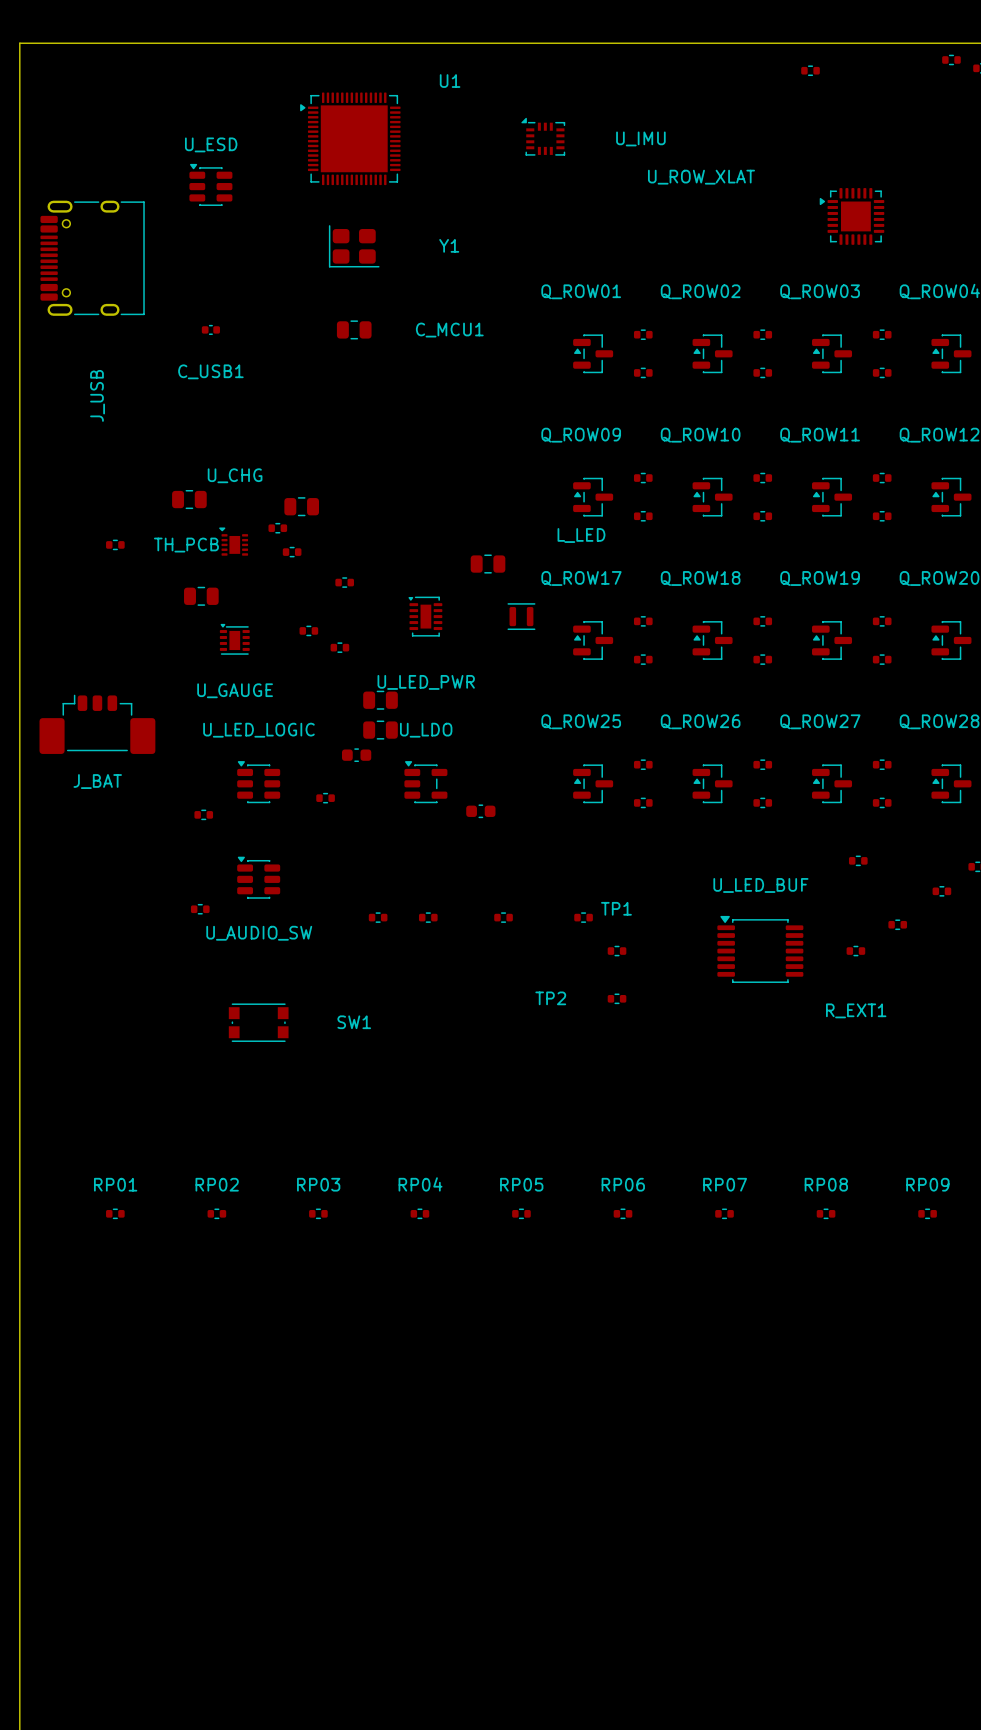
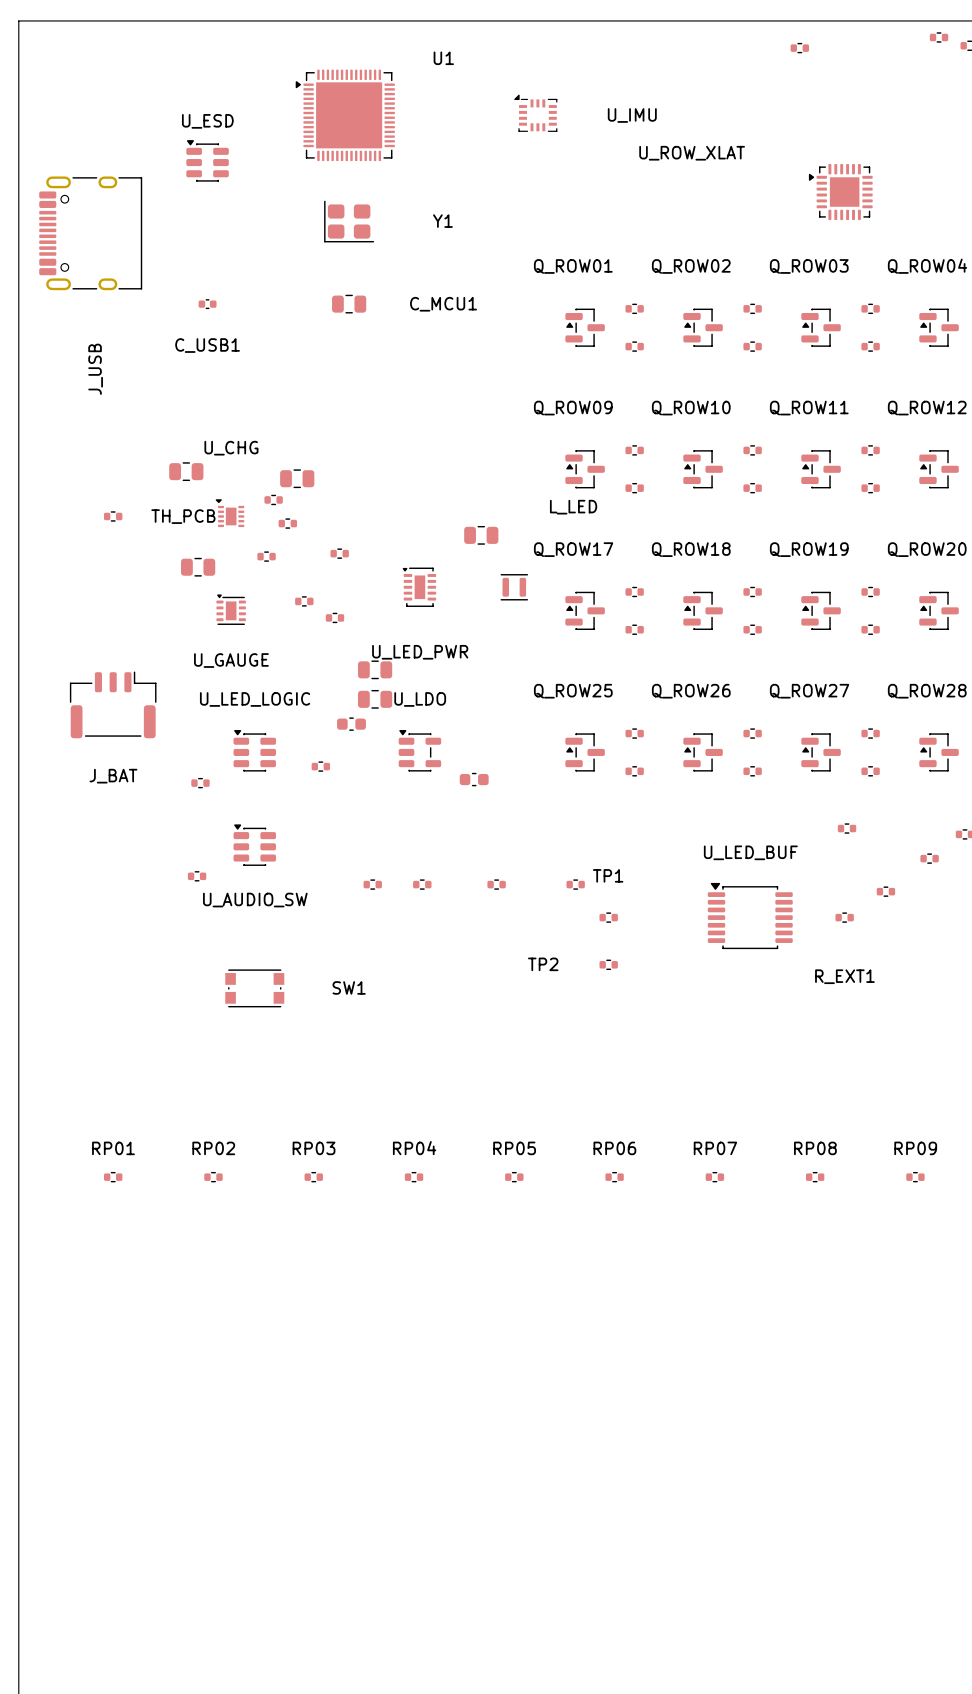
part: none -> (266, 556)
J_BAT: (97, 724) -> none
J_BAT: none -> (113, 704)

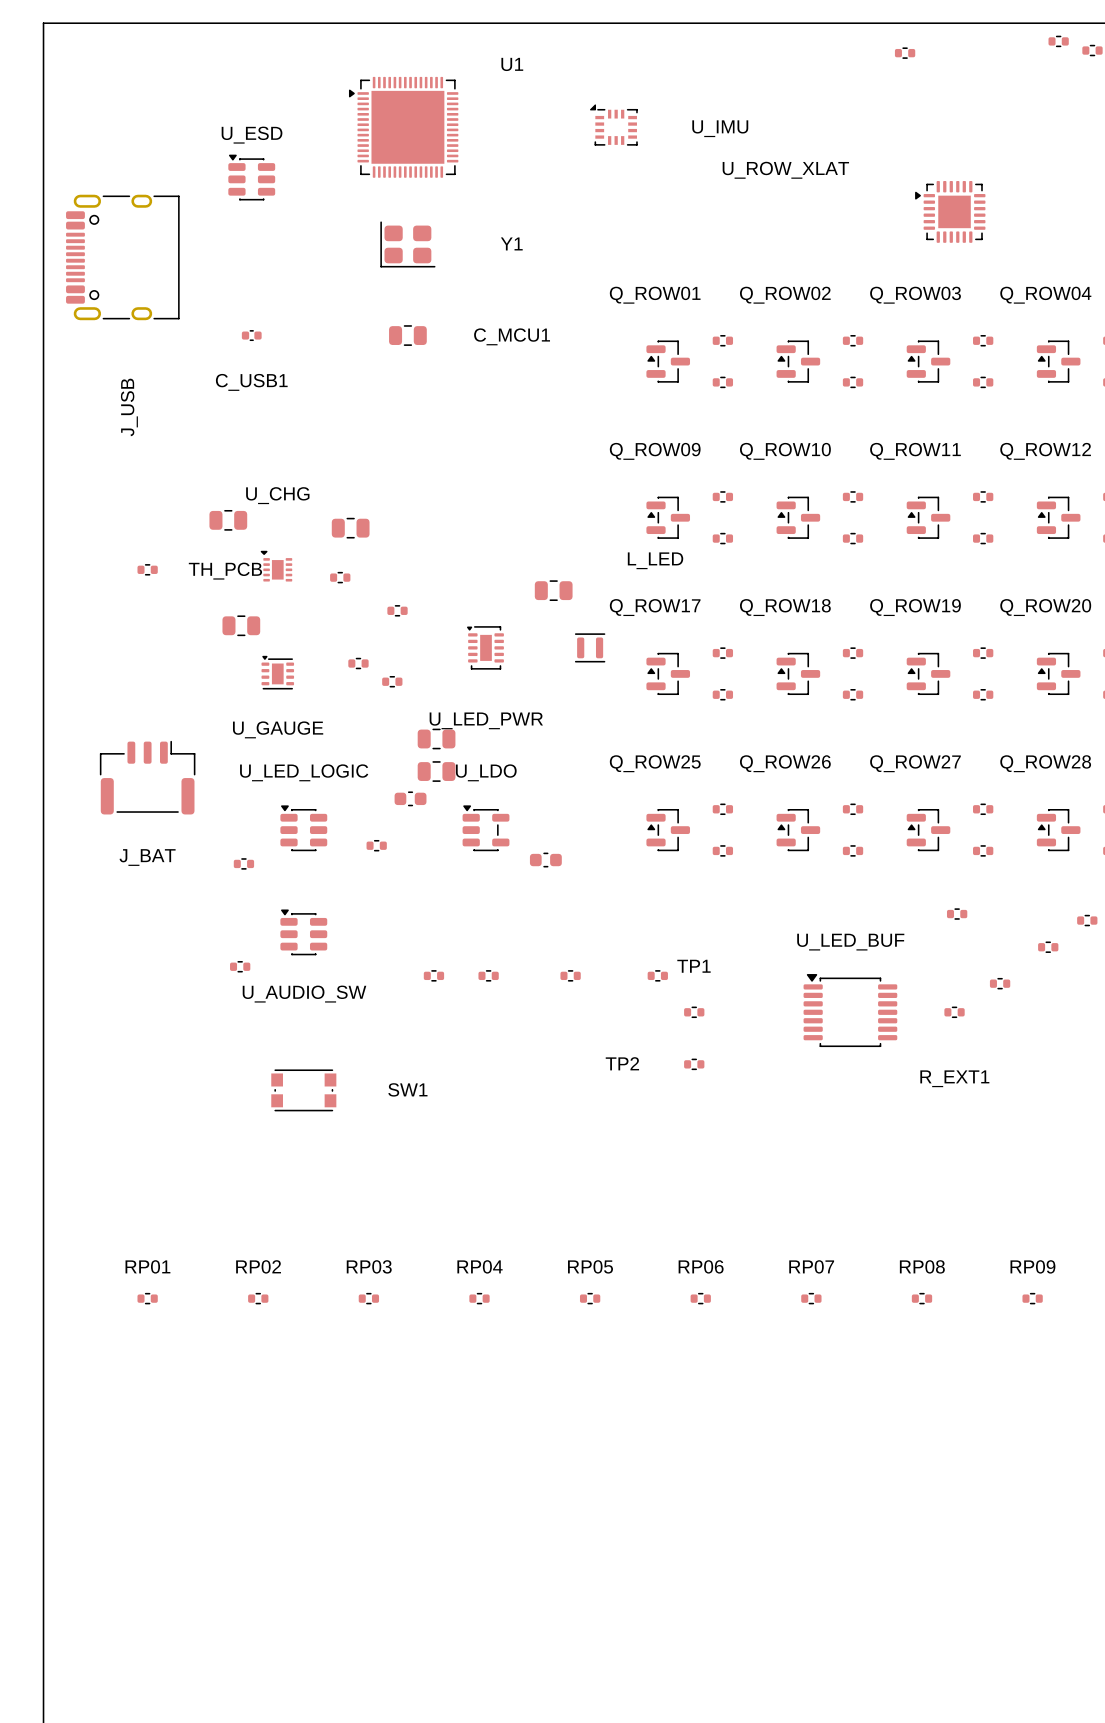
part: (273, 499) -> none
part: (266, 556) -> none

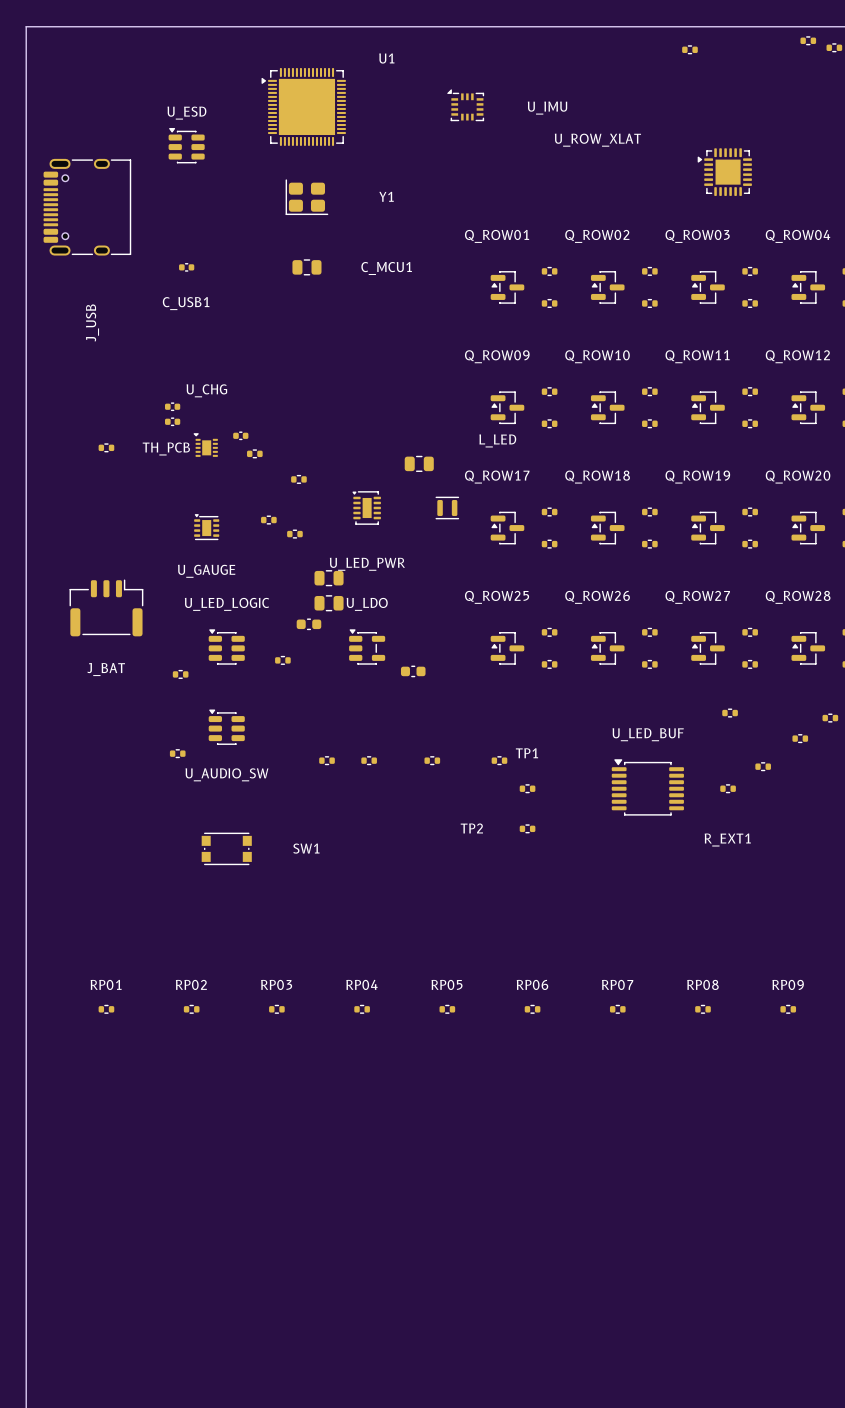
part footprint: [209, 510, 248, 531] -> [164, 402, 181, 411]
part: (350, 528) -> none
part: none -> (172, 421)
part: none -> (240, 435)
part: (241, 625) -> none

